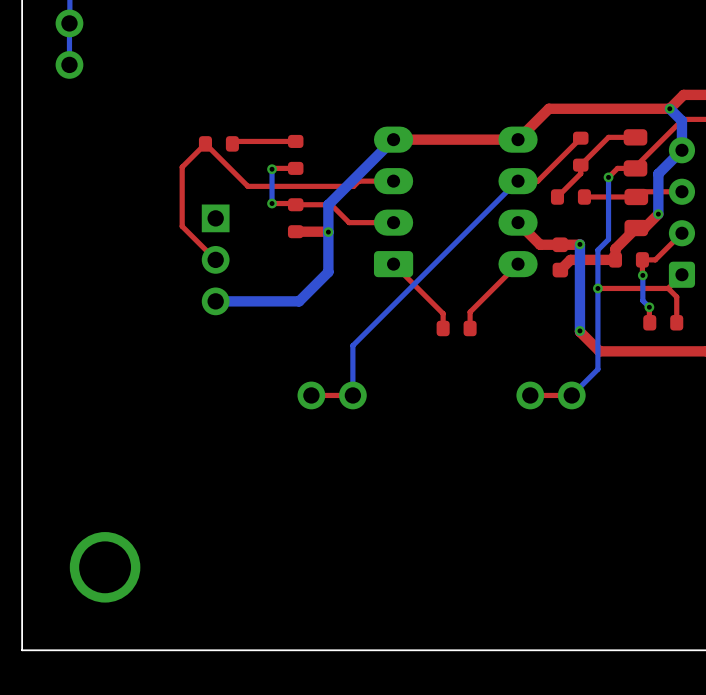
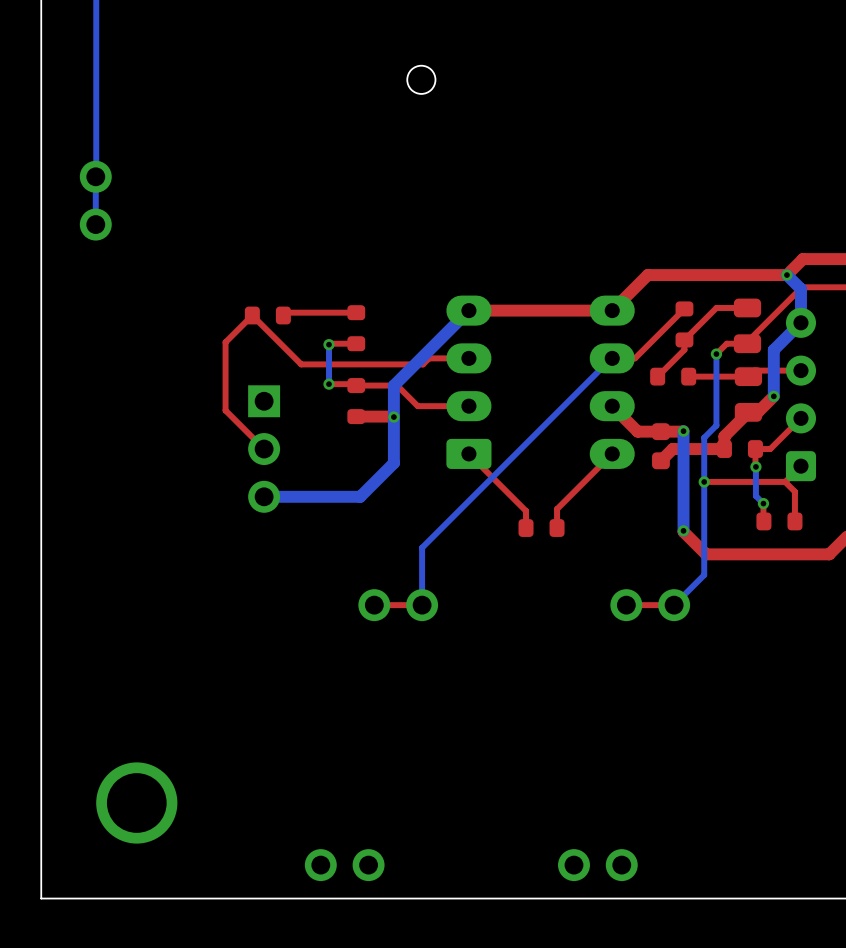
part: none -> (344, 865)
part: none -> (597, 865)

